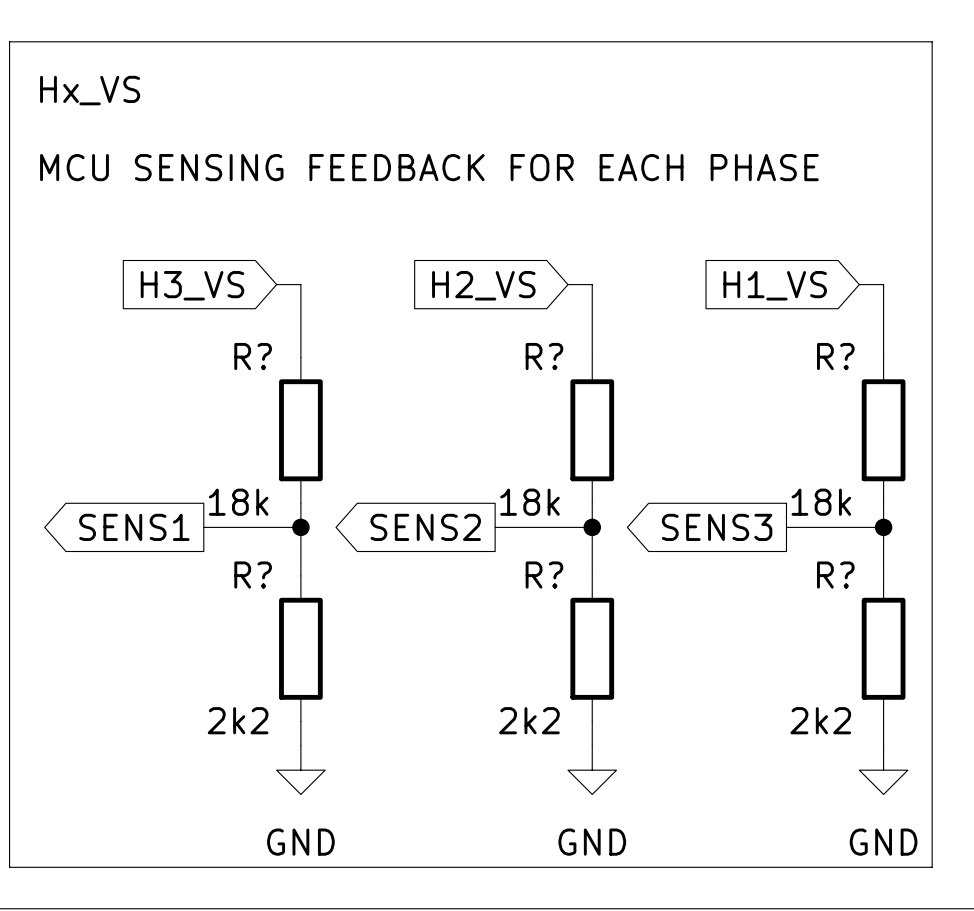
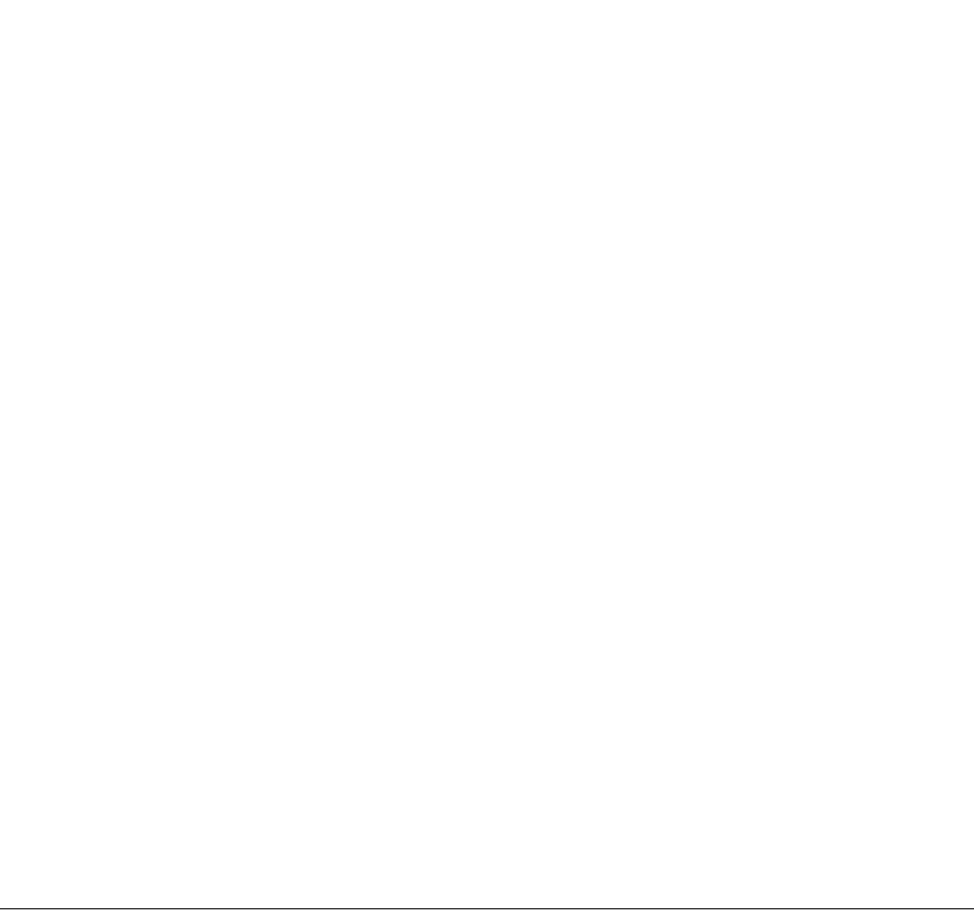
line: (9, 41) (932, 41) (932, 867) (9, 867) (9, 41) -> none
text: Hx_VS (90, 90) -> none
text: MCU SENSING FEEDBACK FOR EACH PHASE (429, 167) -> none
wire: (276, 284) (300, 284) (300, 357) -> none
wire: (567, 284) (592, 284) (592, 357) -> none
wire: (859, 284) (883, 284) (883, 357) -> none
global label: H3_VS (192, 285) -> none
global label: H2_VS (483, 285) -> none
global label: H1_VS (775, 285) -> none
R?: 18k (300, 430) -> none
R?: 18k (592, 430) -> none
R?: 18k (883, 430) -> none
wire: (300, 503) (300, 575) -> none
wire: (592, 503) (592, 575) -> none
wire: (883, 503) (883, 575) -> none
global label: SENS1 (134, 527) -> none
wire: (203, 527) (300, 527) -> none
junction: (300, 527) -> none
global label: SENS2 (425, 527) -> none
wire: (495, 527) (592, 527) -> none
junction: (592, 527) -> none
global label: SENS3 (717, 527) -> none
wire: (786, 527) (883, 527) -> none
junction: (883, 527) -> none
R?: 2k2 (300, 648) -> none
R?: 2k2 (592, 648) -> none
R?: 2k2 (883, 648) -> none
wire: (300, 721) (300, 745) -> none
wire: (592, 721) (592, 745) -> none
wire: (883, 721) (883, 745) -> none
power symbol: GND (300, 770) -> none
power symbol: GND (592, 770) -> none
power symbol: GND (883, 770) -> none

